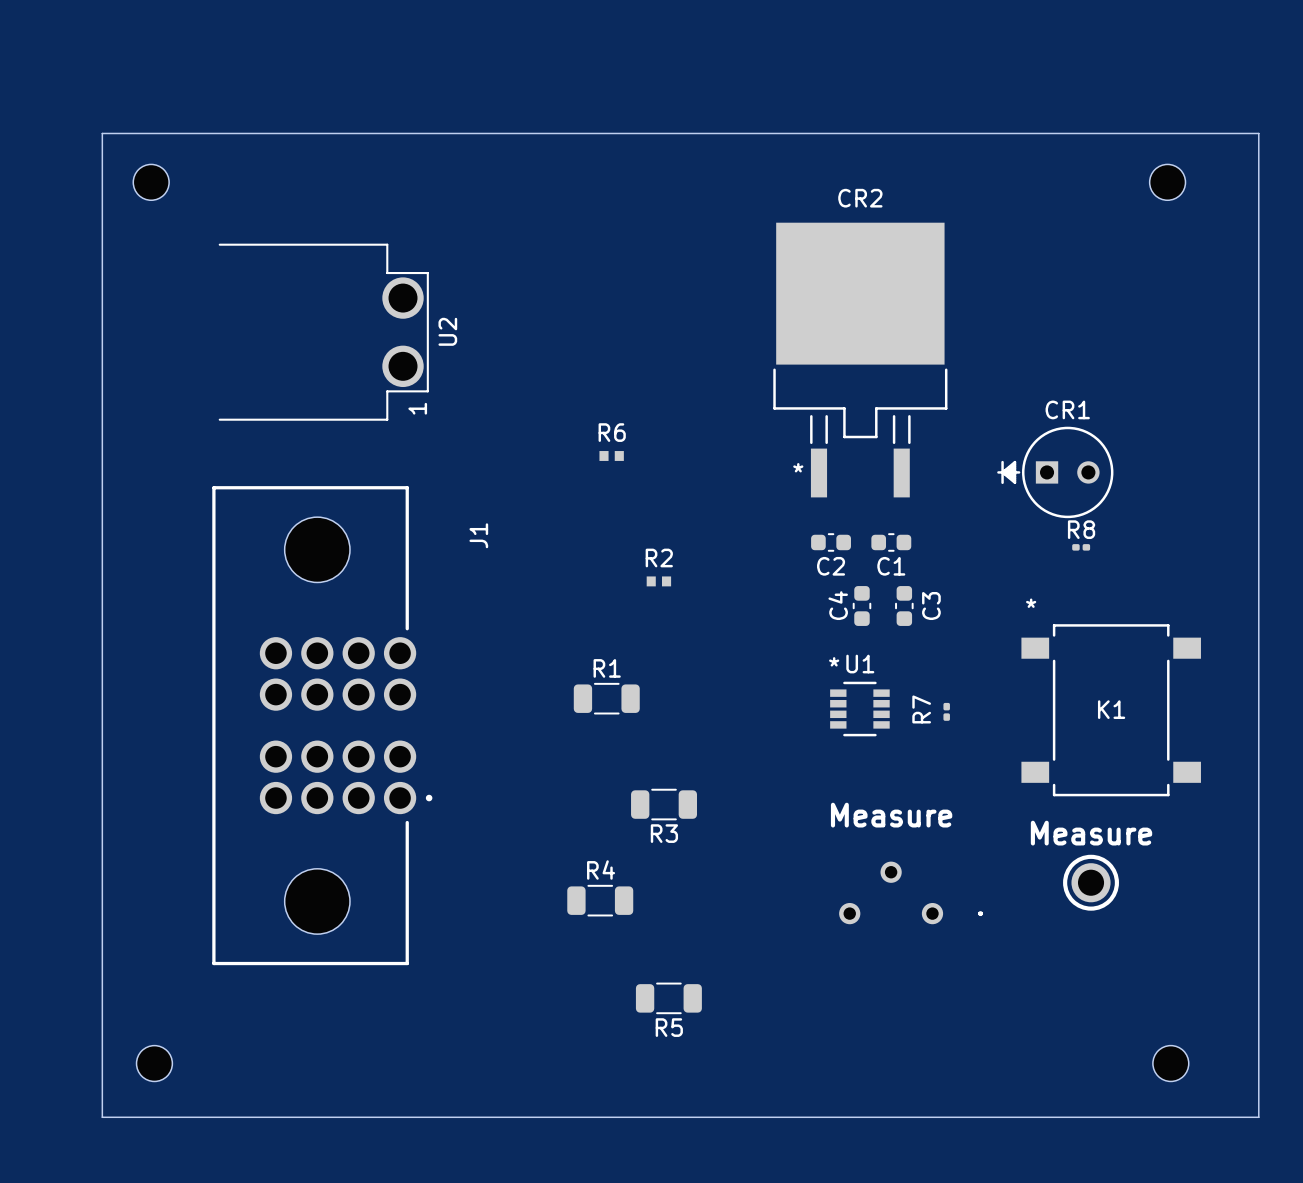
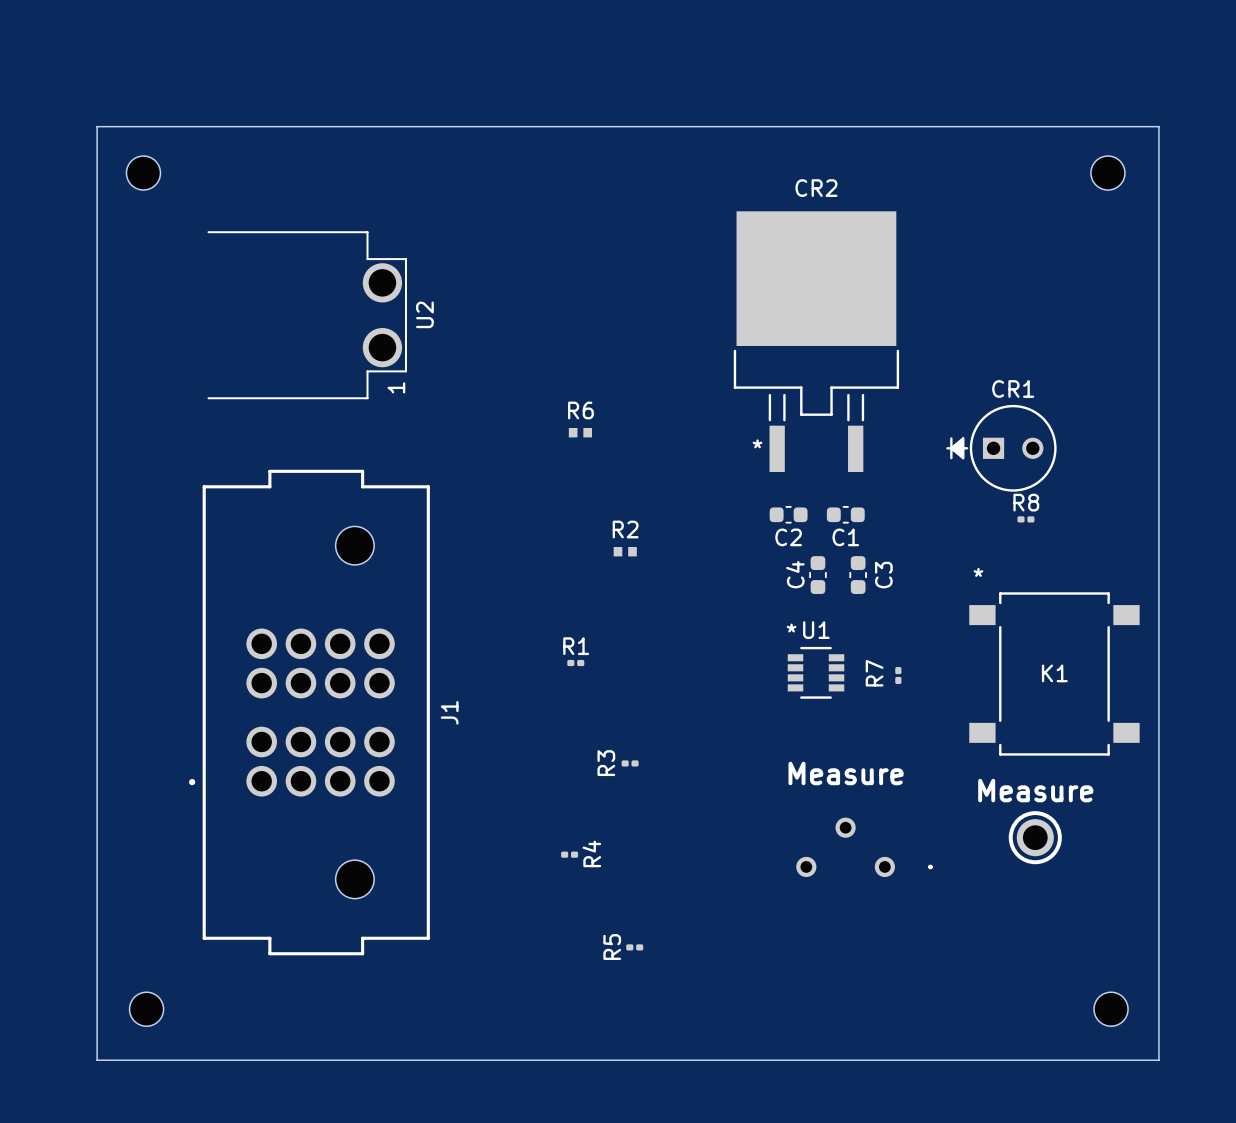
board edge: (1221, 133) (1258, 133) (1258, 1117) (1221, 1117) -> (1158, 126) (1158, 1060)
J1 footprint: [212, 486, 433, 966] -> [189, 469, 430, 956]
J1 name position: J1 (478, 535) -> J1 (449, 712)
R1 footprint: [573, 682, 640, 715] -> [567, 659, 585, 667]
R3 footprint: [631, 788, 698, 821] -> [621, 760, 639, 767]
R3 name position: R3 (664, 833) -> R3 (606, 763)
R4 name position: R4 (601, 870) -> R4 (591, 853)
R4 footprint: [567, 884, 634, 917] -> [561, 851, 579, 858]
R5 footprint: [635, 982, 702, 1015] -> [626, 944, 644, 951]
R5 name position: R5 (669, 1027) -> R5 (612, 947)

